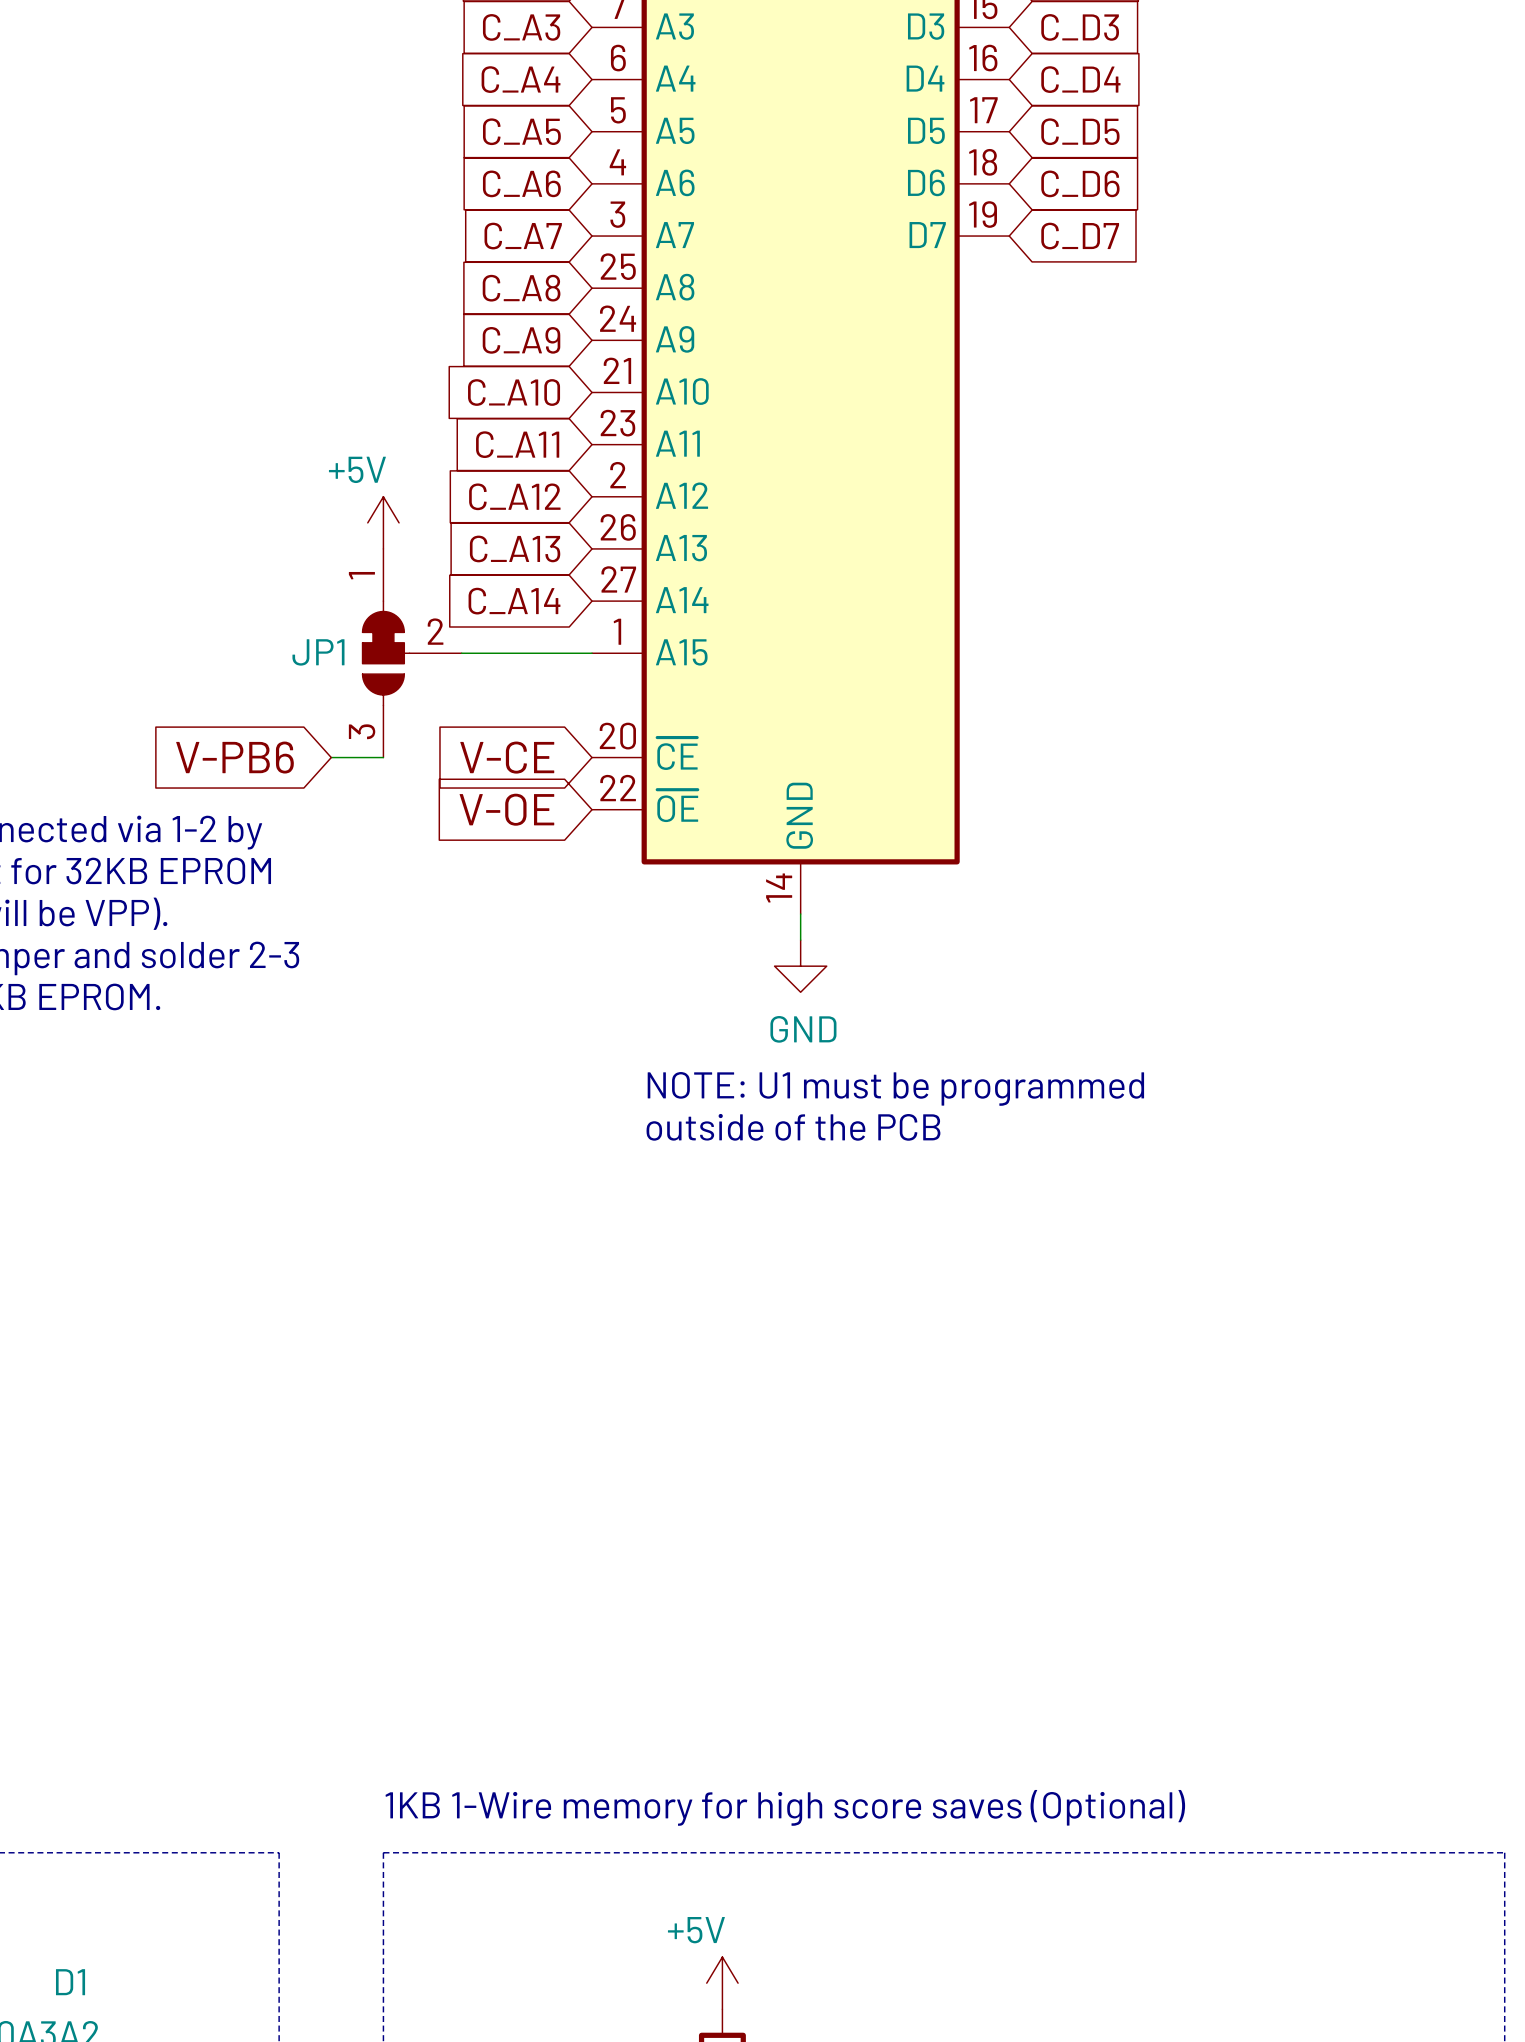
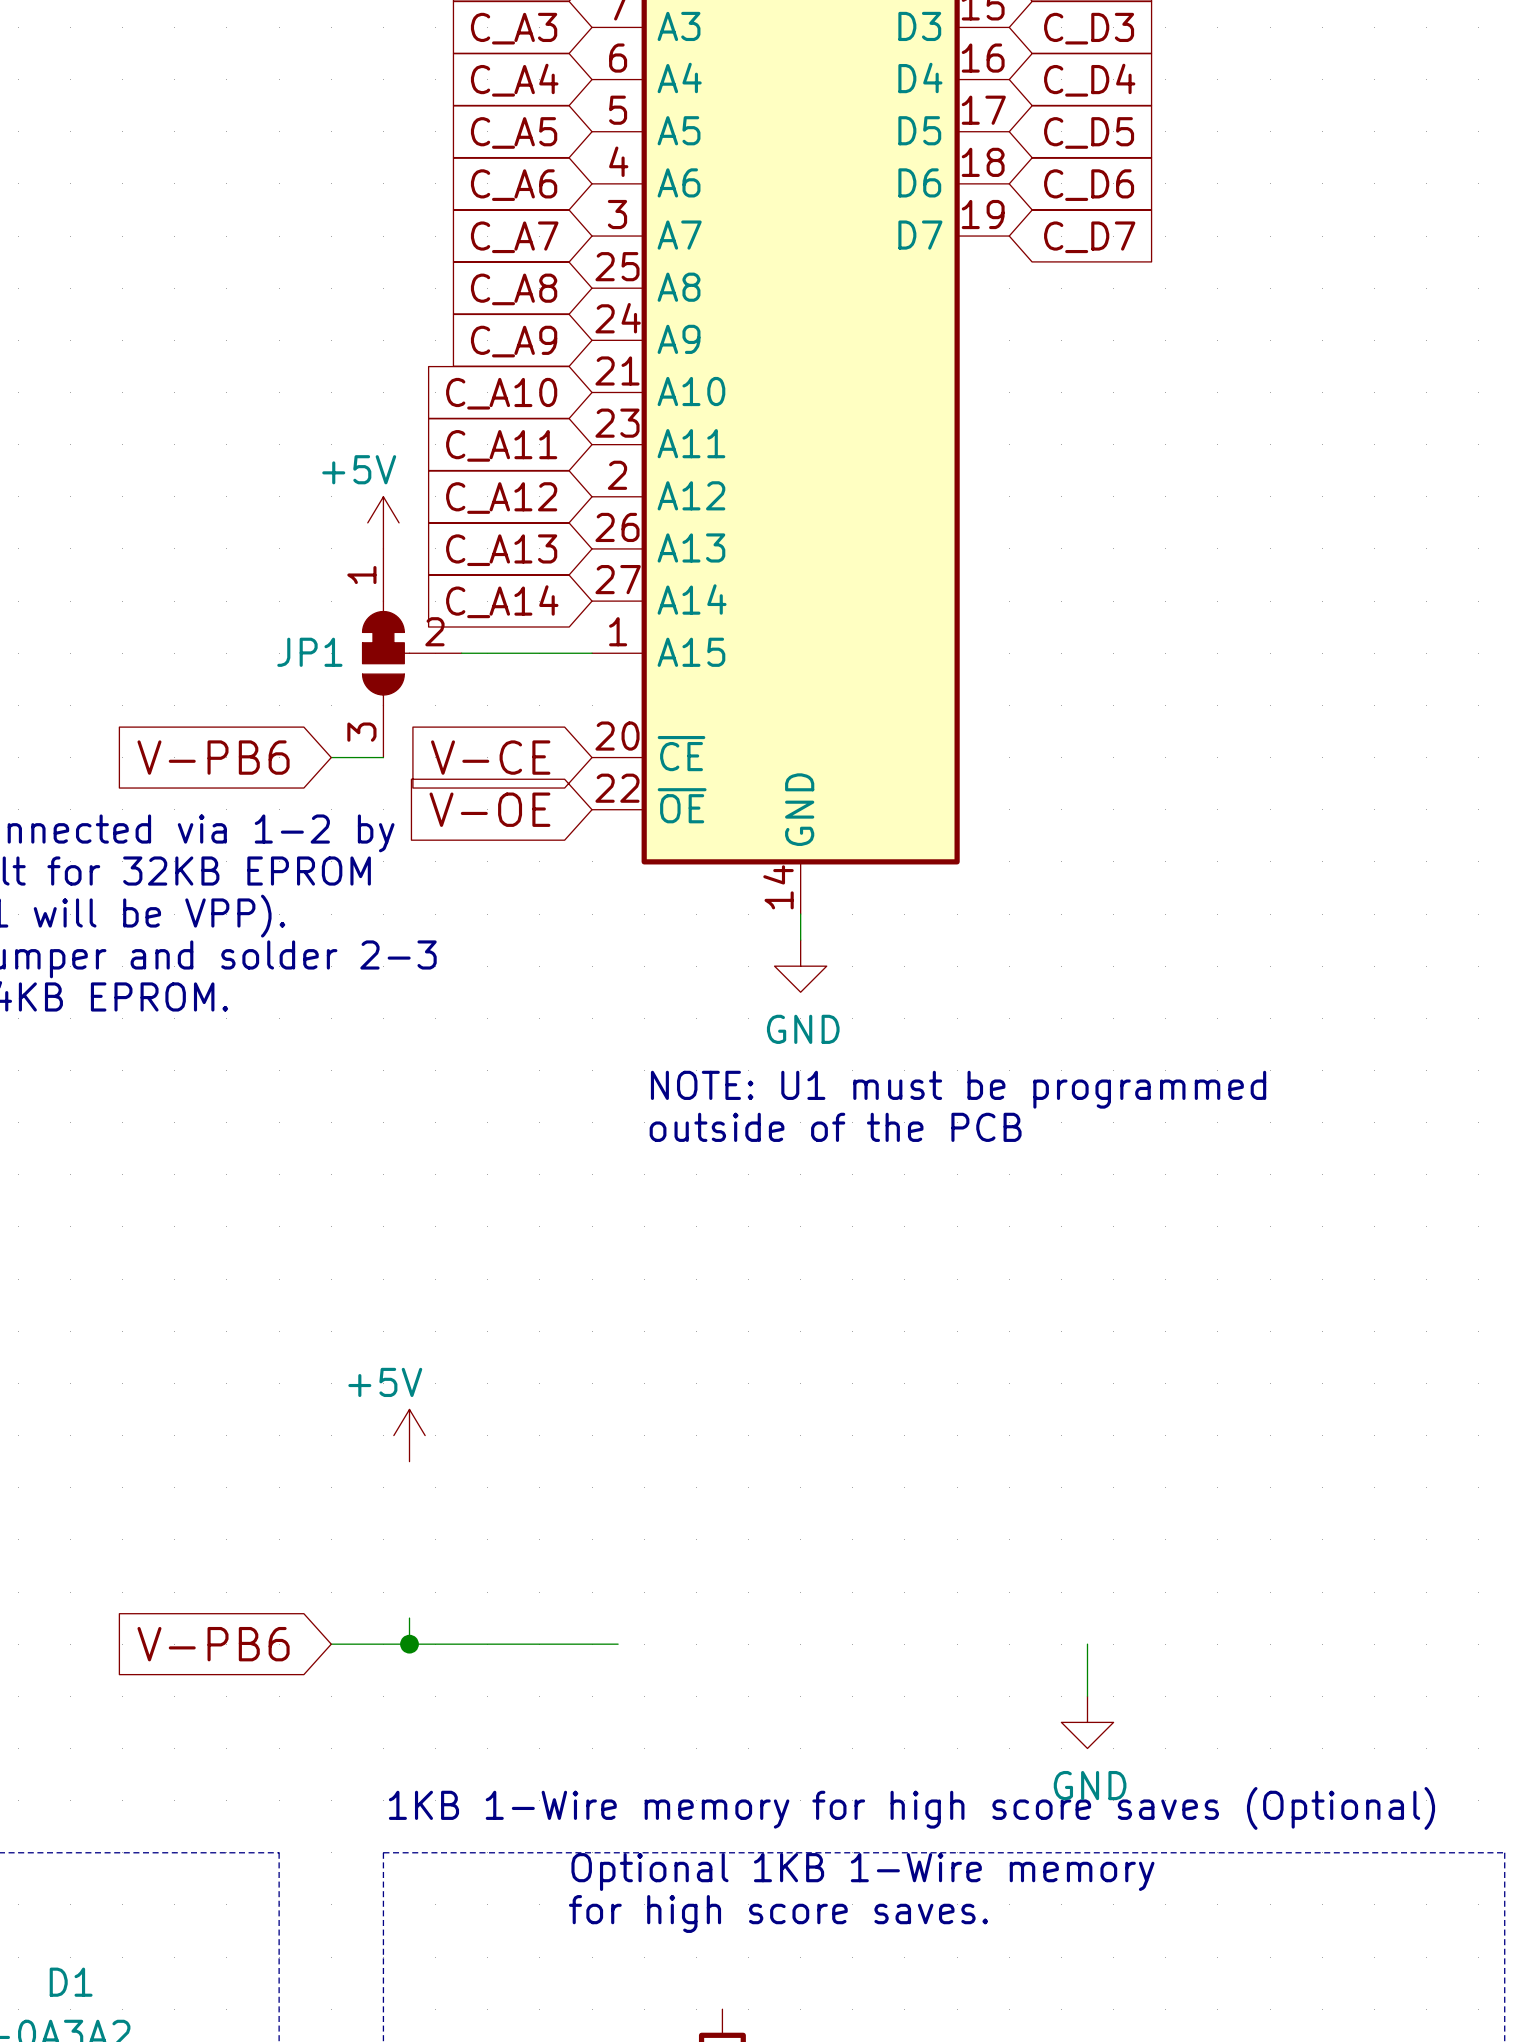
power symbol: none -> +5V (409, 1435)
wire: none -> (409, 1618) (409, 1644)
global label: none -> V-PB6 (213, 1644)
wire: none -> (331, 1644) (618, 1644)
junction: none -> (409, 1644)
wire: none -> (1087, 1644) (1087, 1696)
power symbol: none -> GND (1087, 1722)
text: none -> Optional 1KB 1-Wire memory (862, 1872)
text: none -> for high score saves. (778, 1913)
power symbol: +5V (722, 1983) -> none

